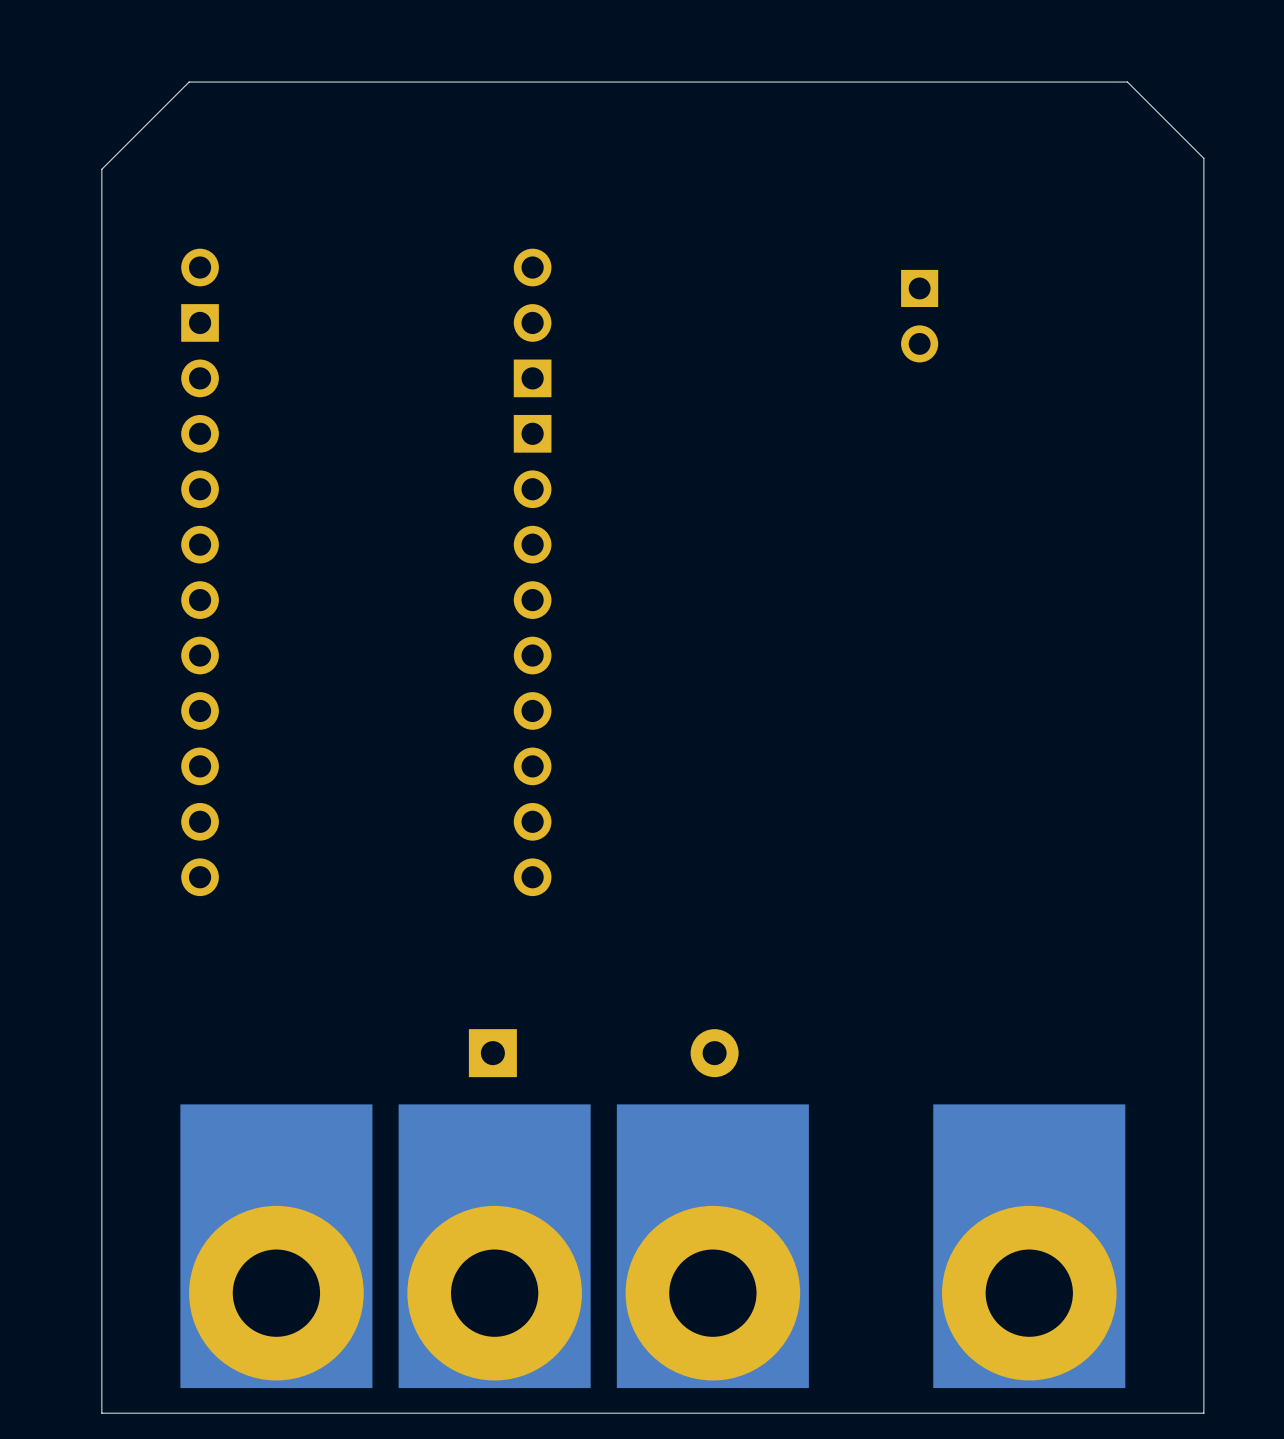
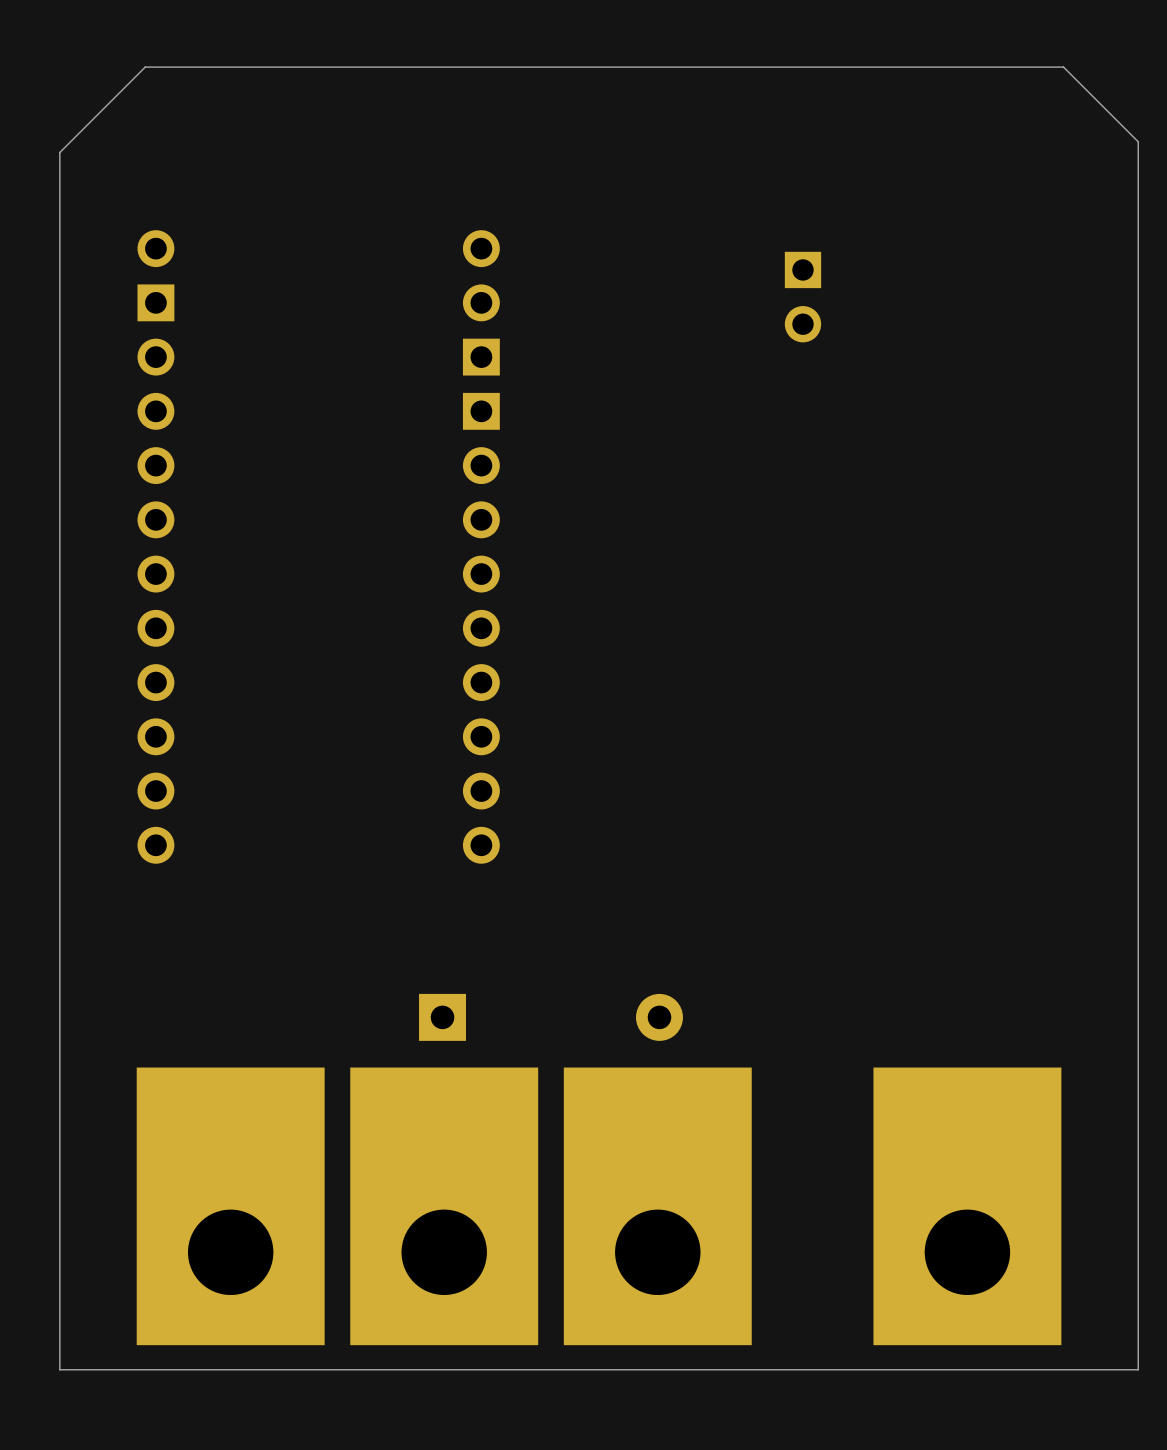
part position: (919, 316) -> (802, 297)

